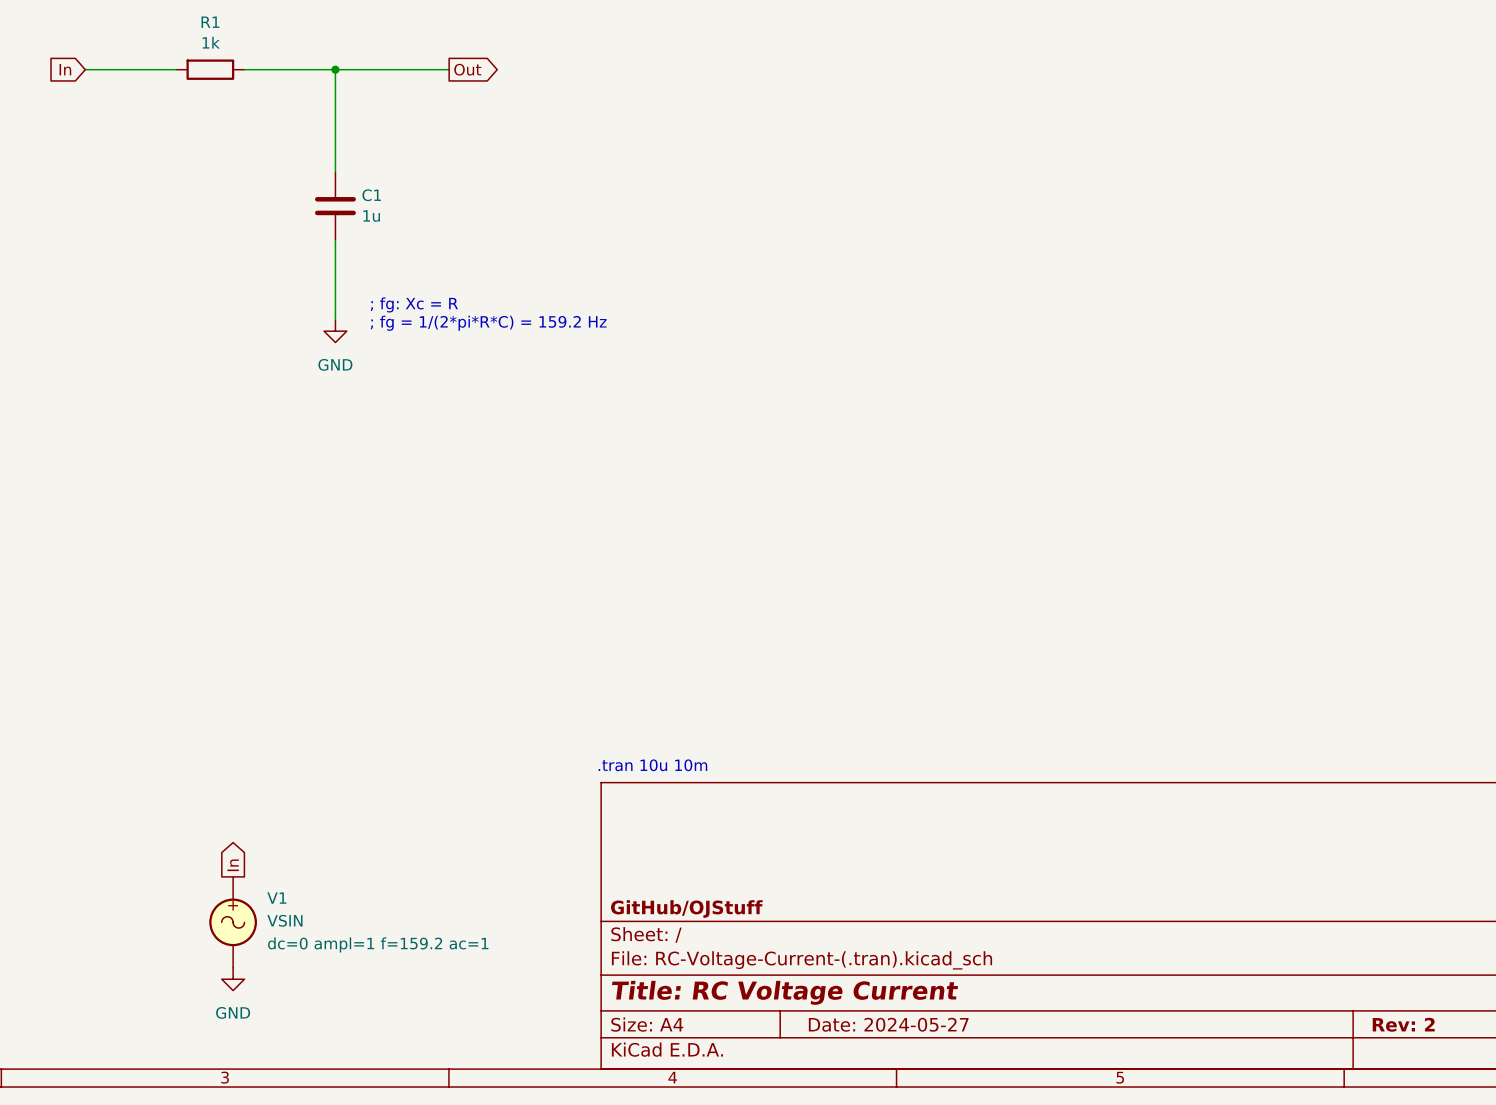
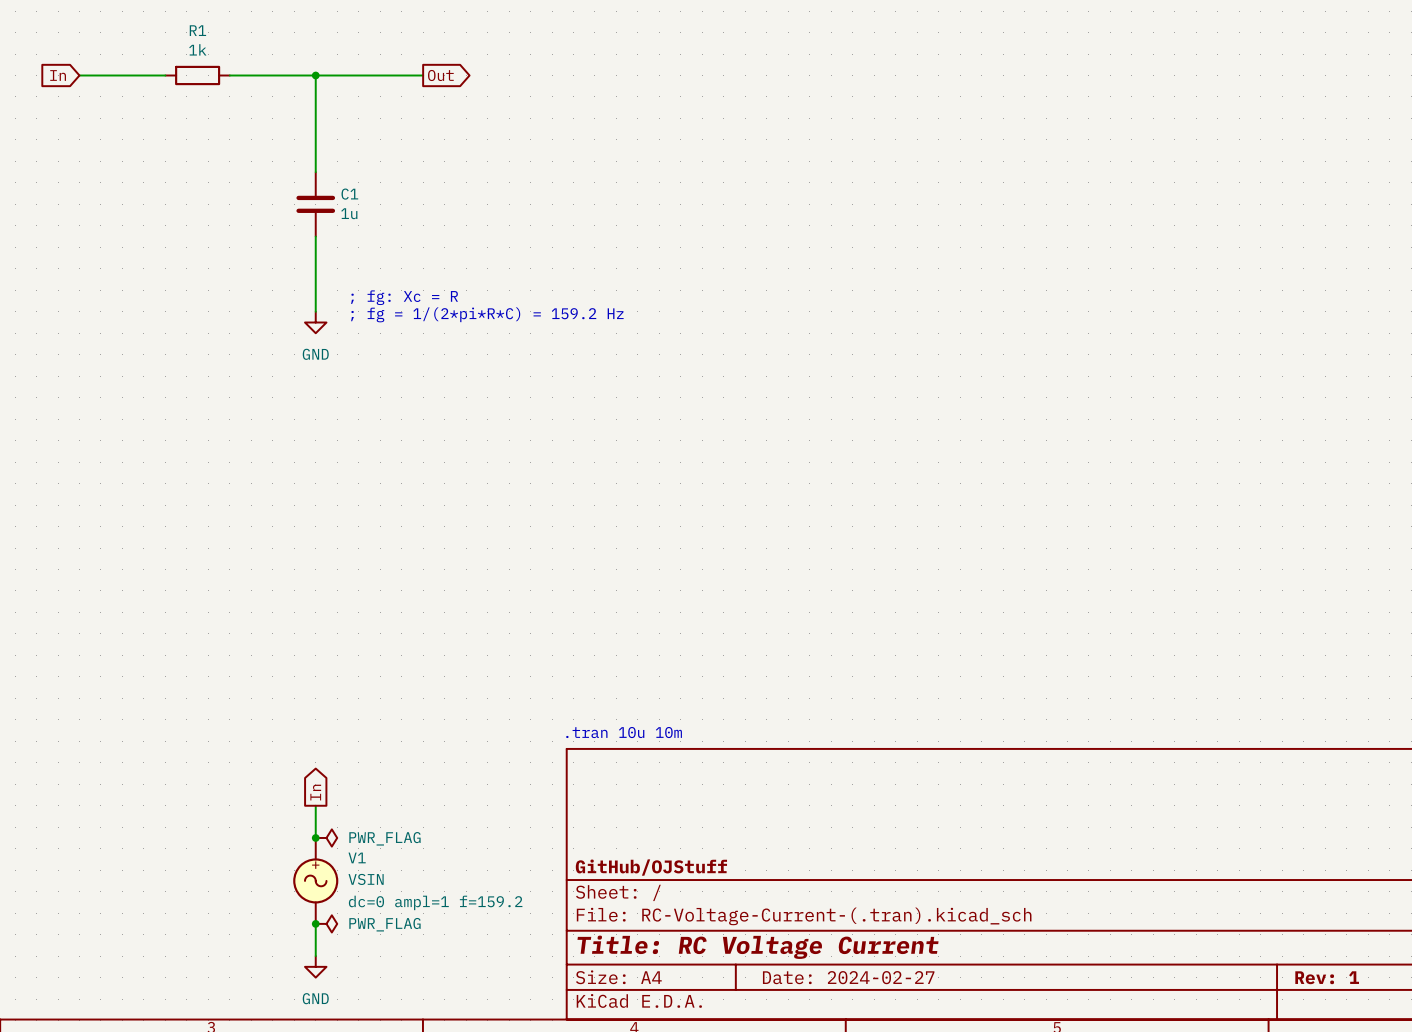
wire: none -> (315, 805) (315, 837)
global label position: In (233, 865) -> In (315, 792)
junction: none -> (315, 837)
power symbol: none -> PWR_FLAG (326, 837)
V1 position: (233, 922) -> (315, 880)
V1 text: dc=0 ampl=1 f=159.2 ac=1 (378, 944) -> dc=0 ampl=1 f=159.2 (435, 902)
wire: none -> (315, 923) (315, 956)
junction: none -> (315, 923)
power symbol: none -> PWR_FLAG (326, 923)
power symbol position: GND (233, 979) -> GND (315, 966)
title block: Date: 2024-05-27 (888, 1024) -> Date: 2024-02-27 (848, 977)
title block: Rev: 2 (1403, 1024) -> Rev: 1 (1327, 977)

